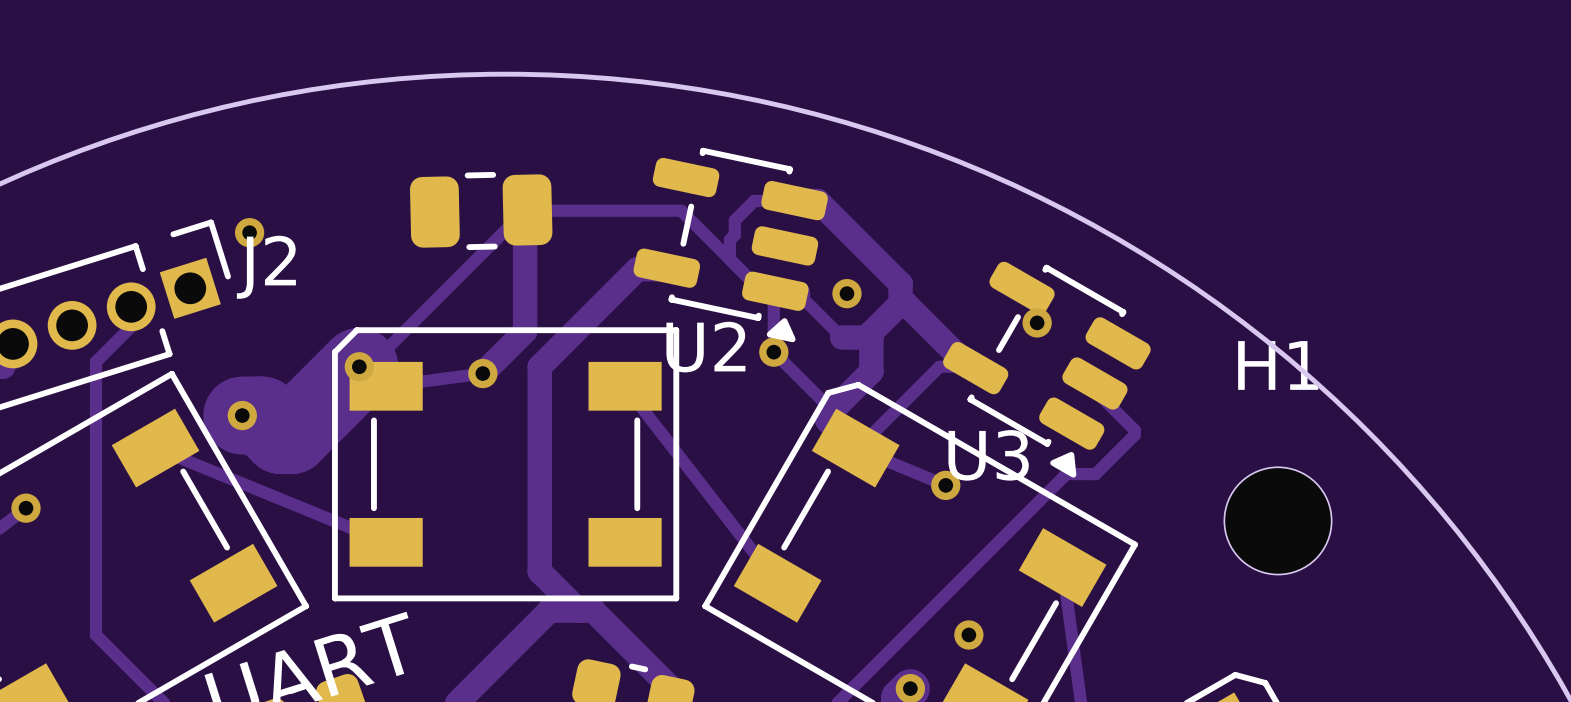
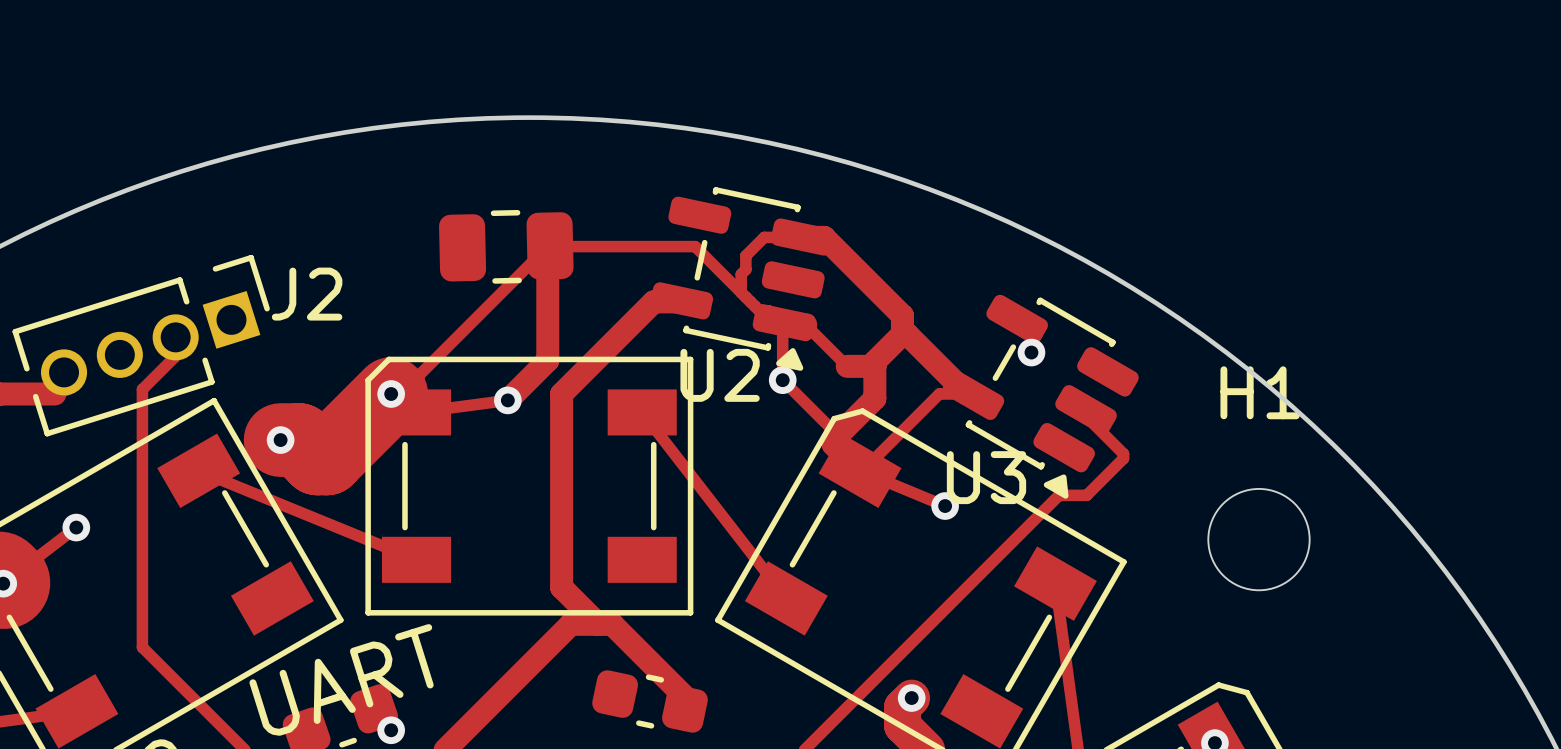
via: (249, 232) -> none
via: (846, 293) -> none
via: (968, 634) -> none

